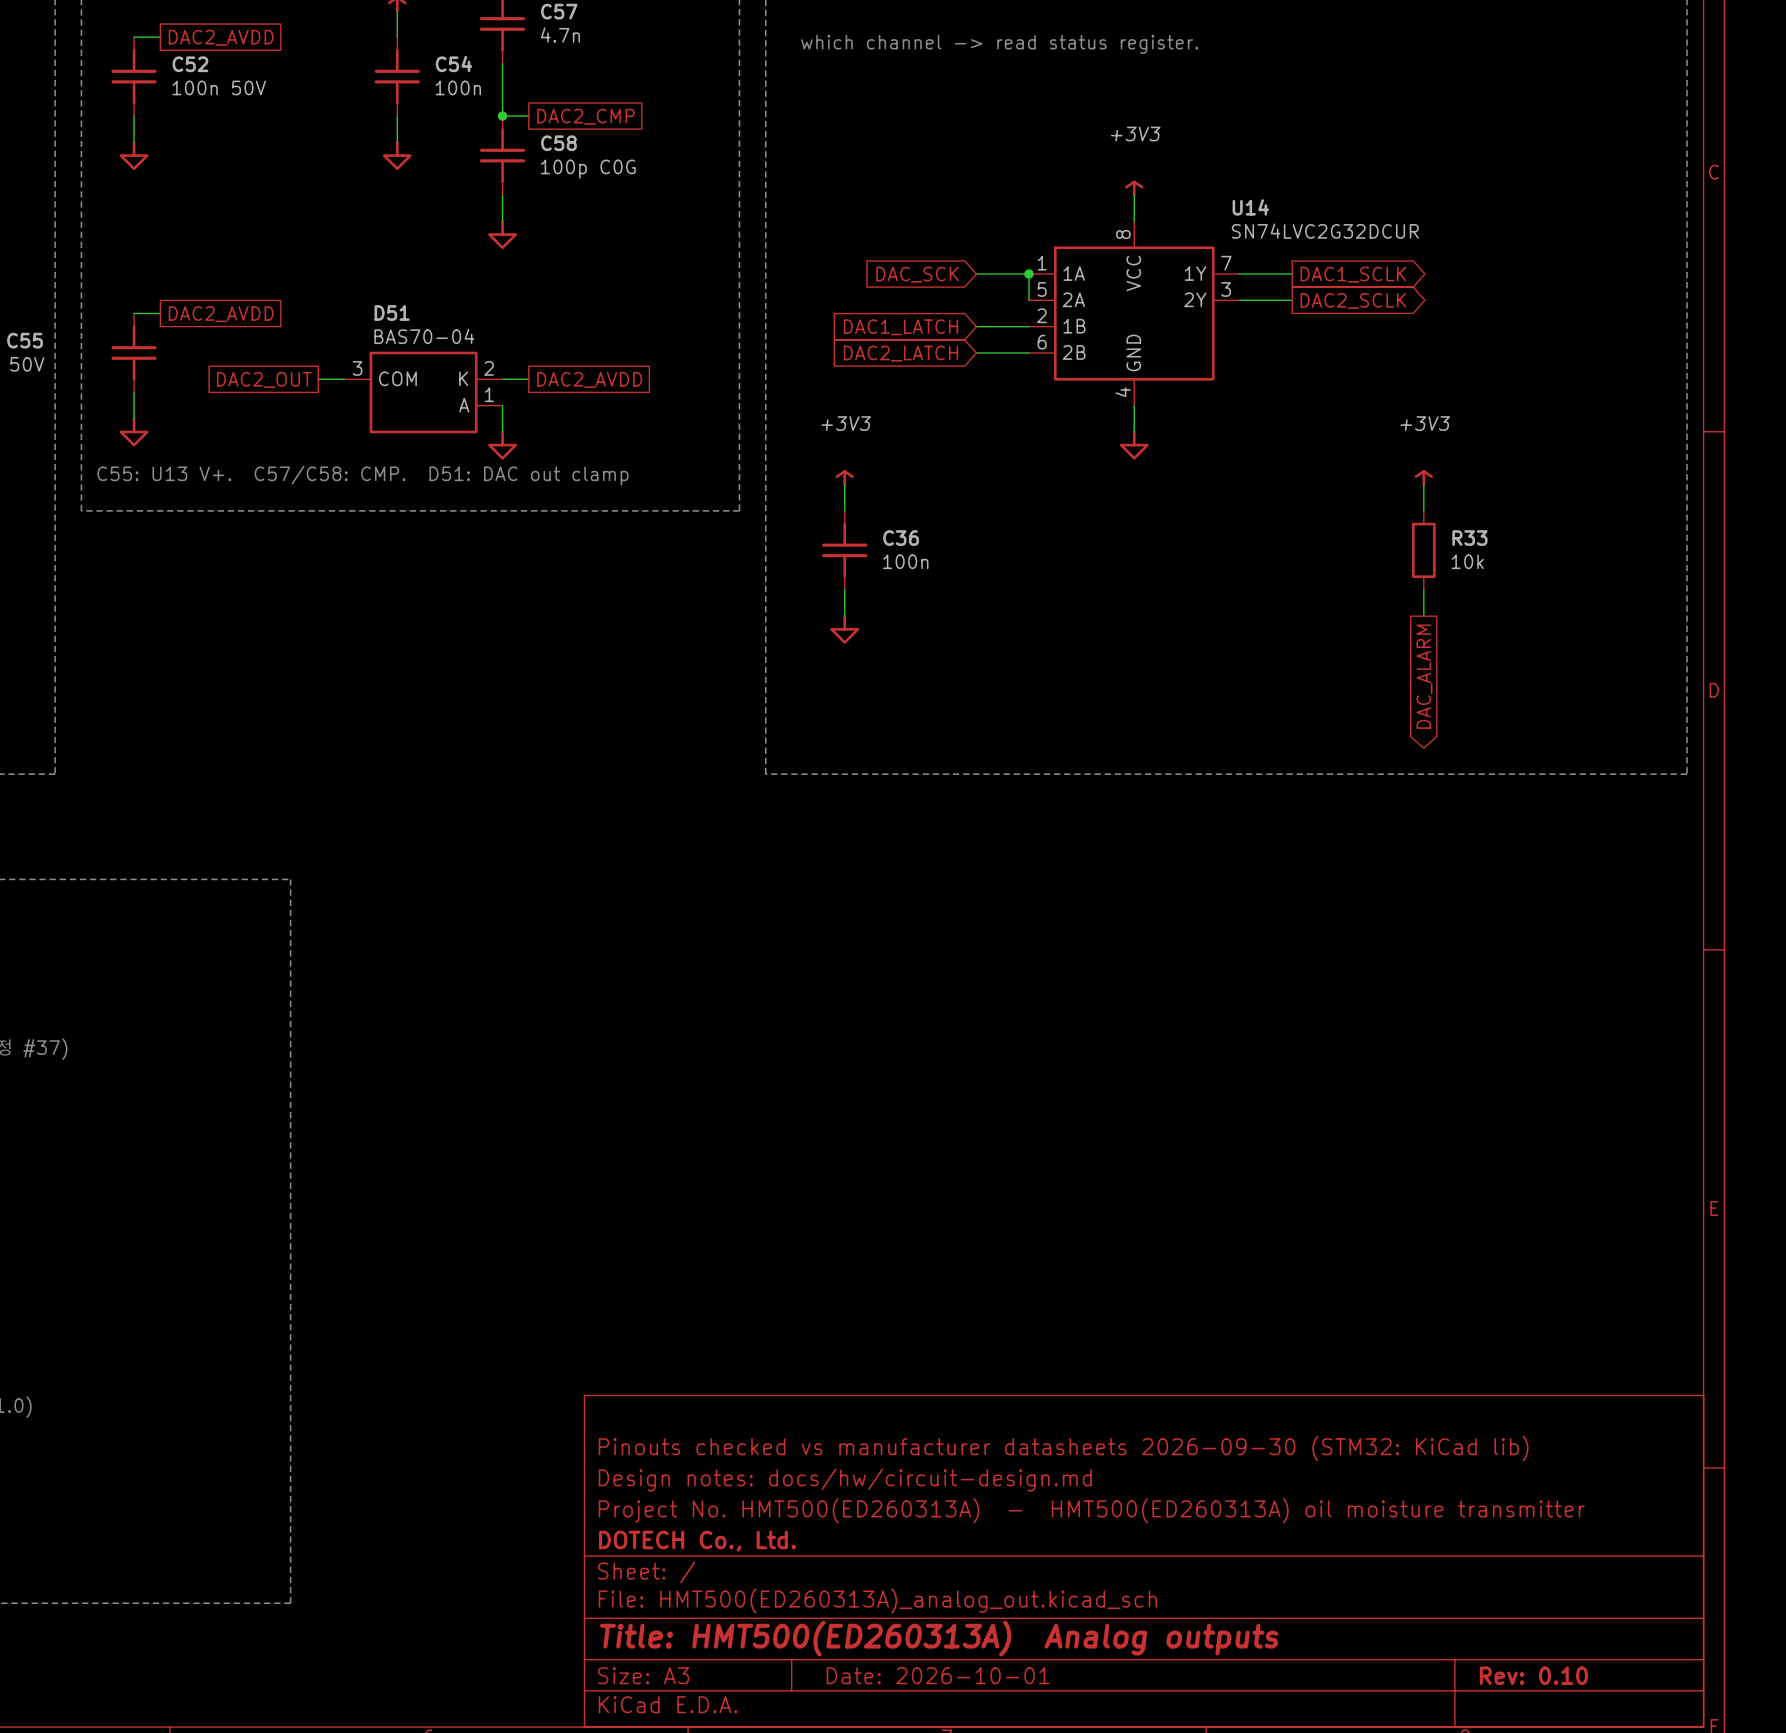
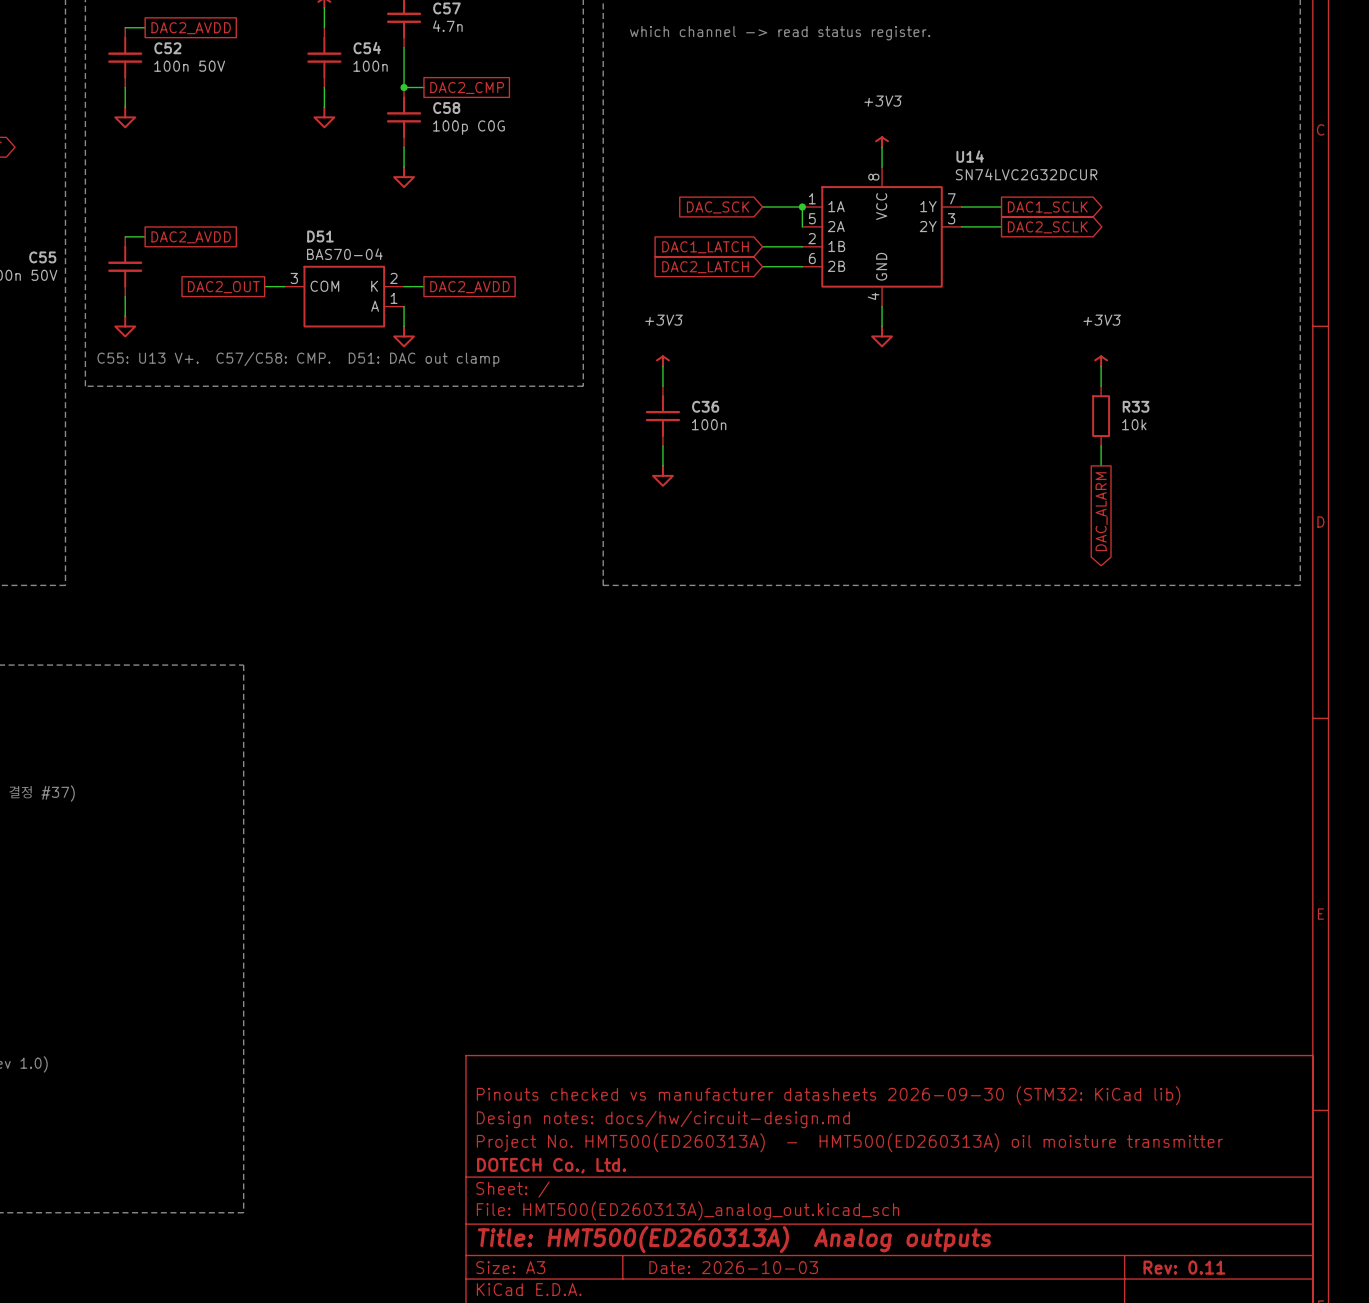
title block: Date: 2026-10-01 (938, 1675) -> Date: 2026-10-03 (733, 1267)
title block: Rev: 0.10 (1533, 1675) -> Rev: 0.11 (1184, 1267)

